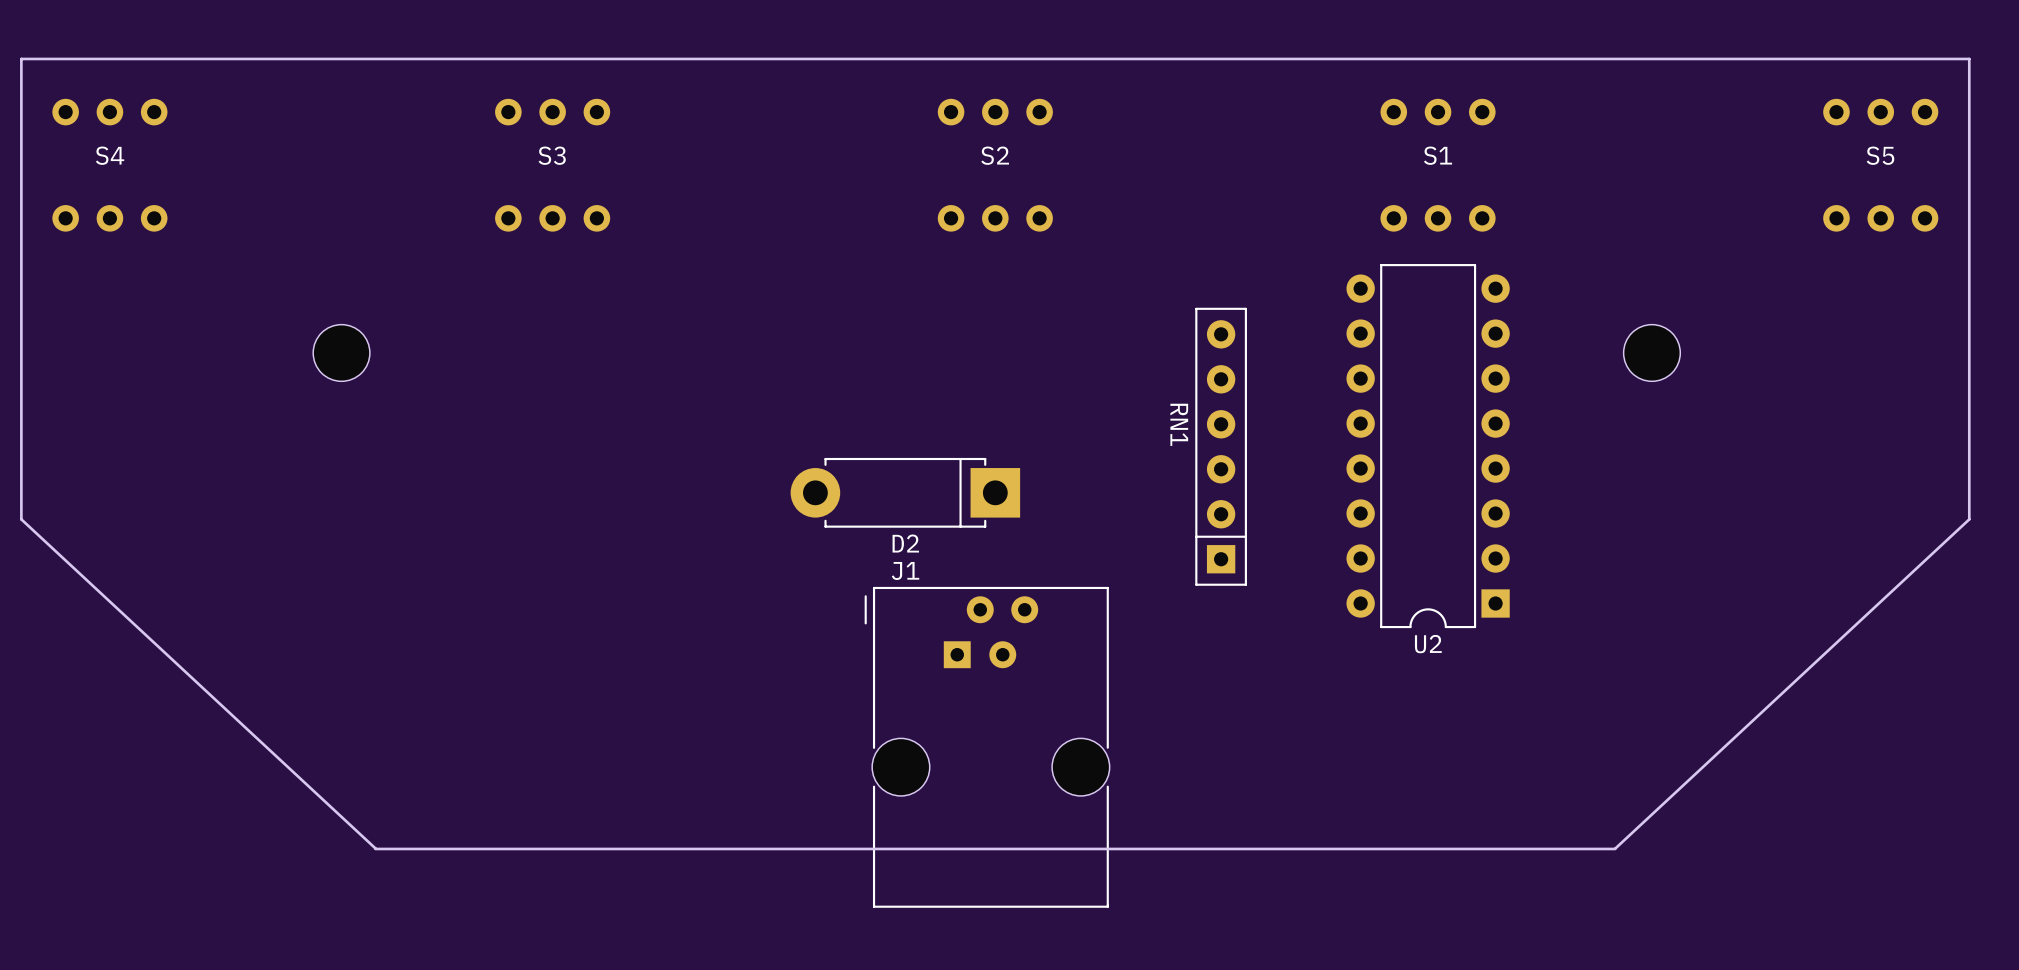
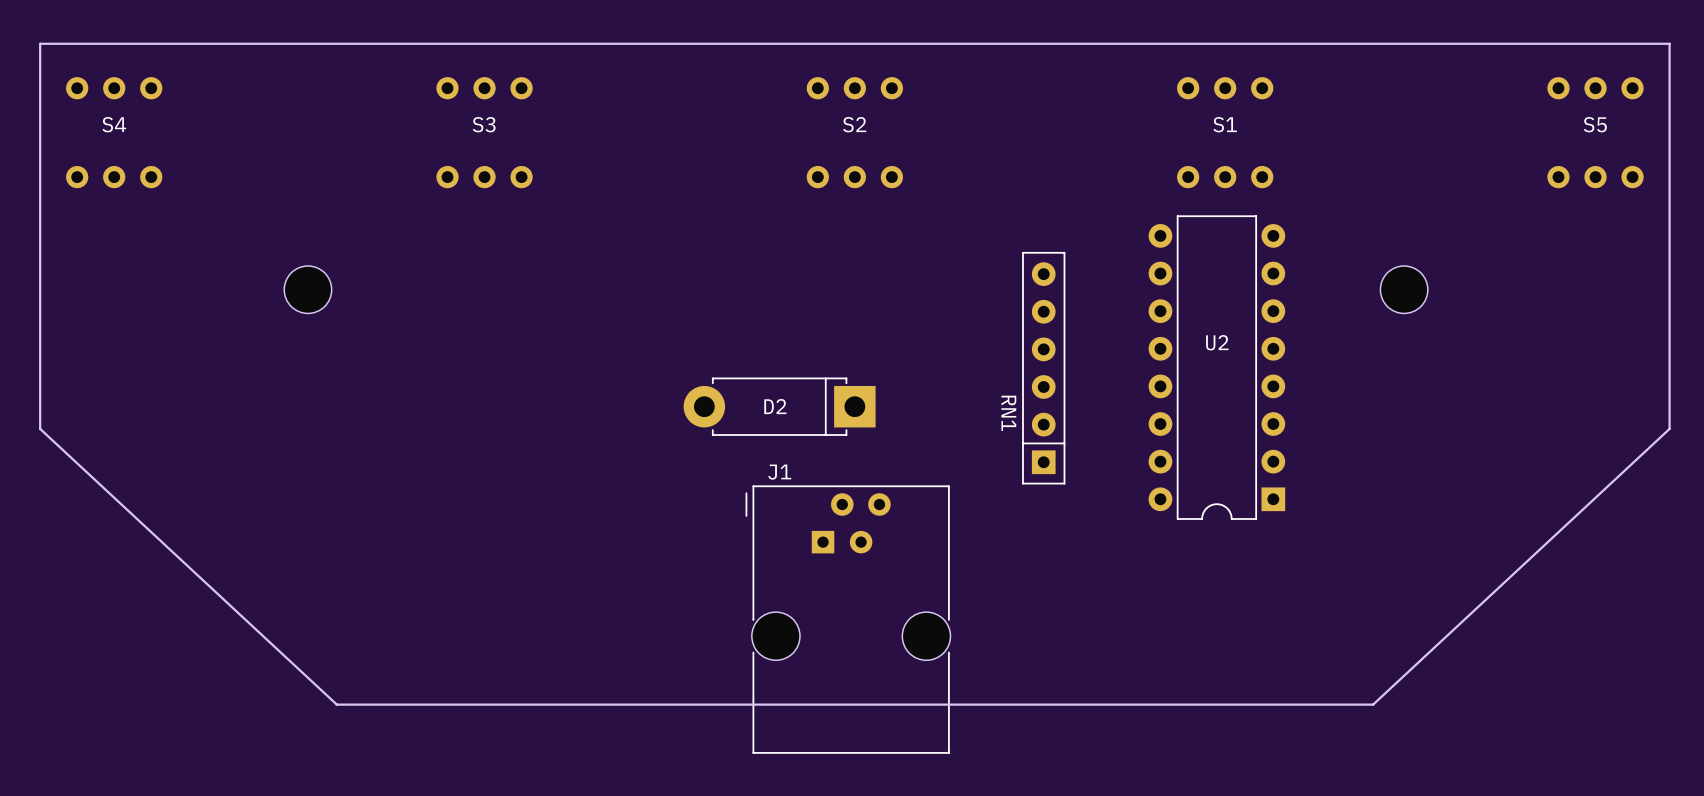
RN1 name position: RN1 (1179, 424) -> RN1 (1008, 413)
D2 name position: D2 (905, 543) -> D2 (775, 406)
U2 name position: U2 (1428, 644) -> U2 (1217, 342)

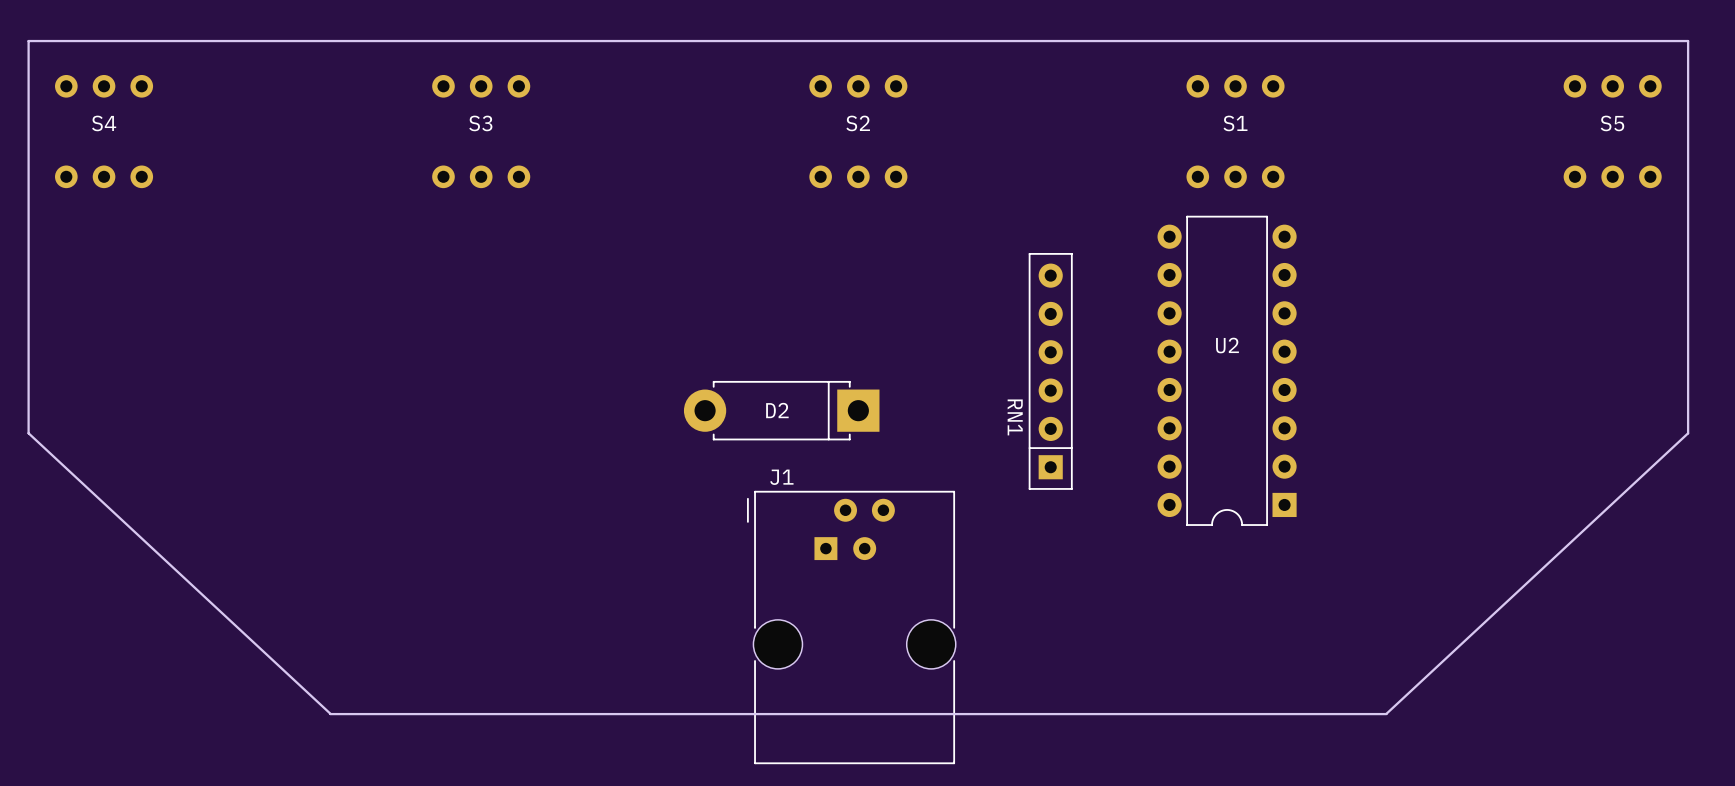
part: (307, 289) -> none
part: (1404, 289) -> none

